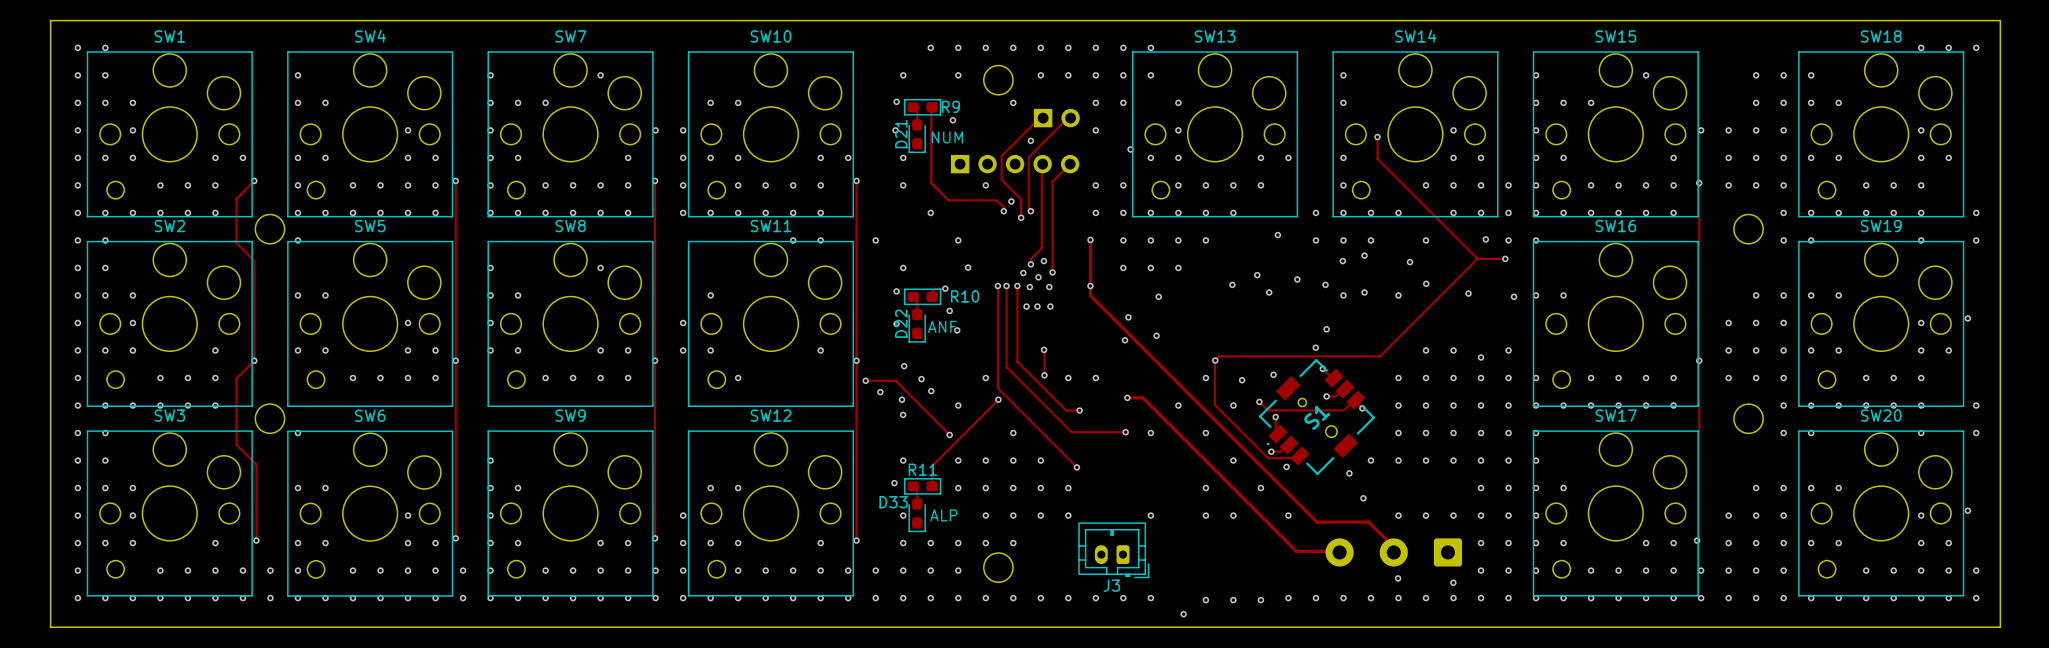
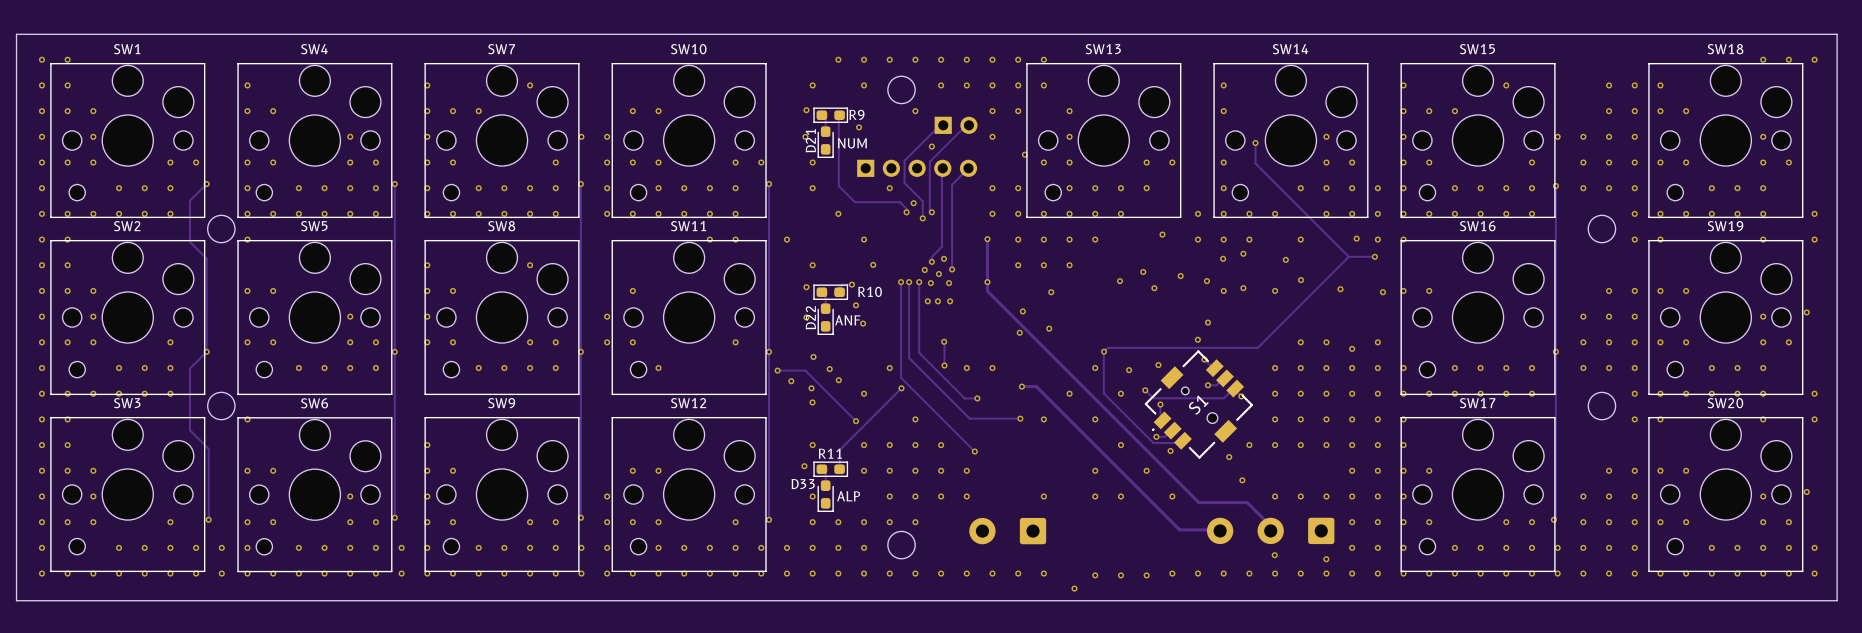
J3: (1113, 550) -> none
part: none -> (1007, 531)

